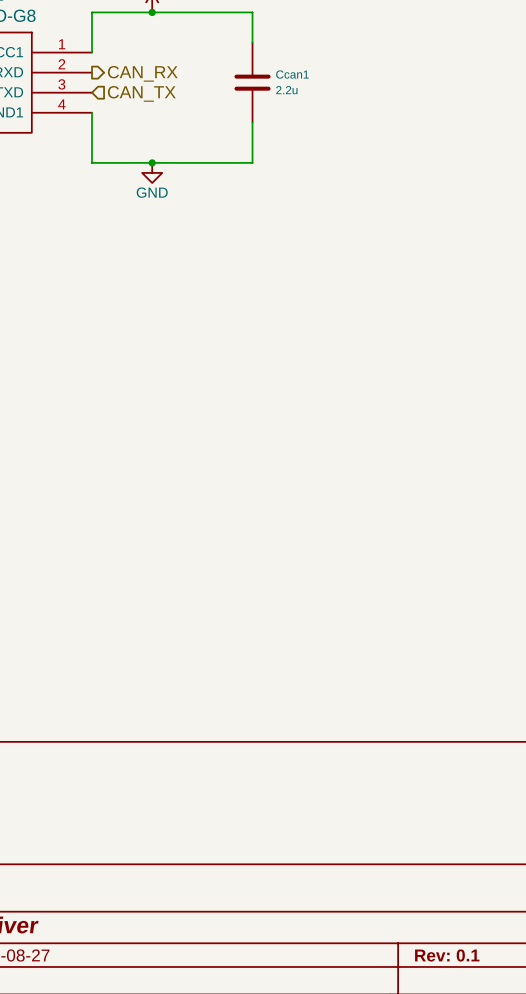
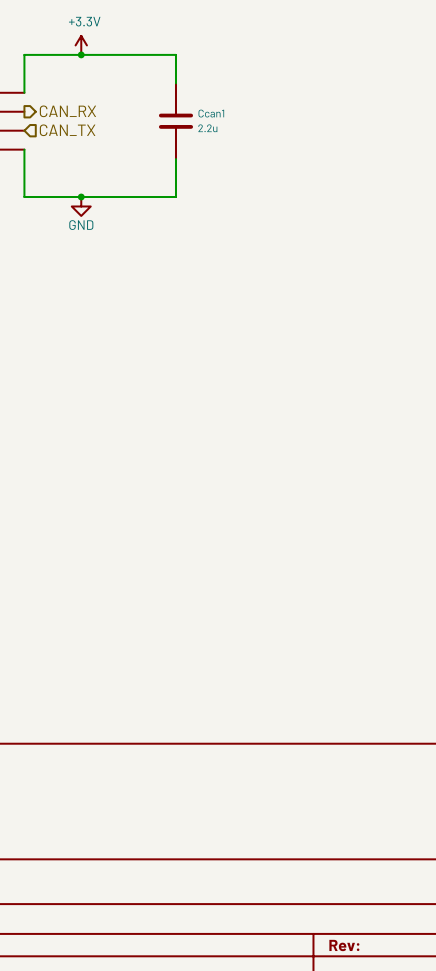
title block: Rev: 0.1 (447, 955) -> Rev: (344, 945)

